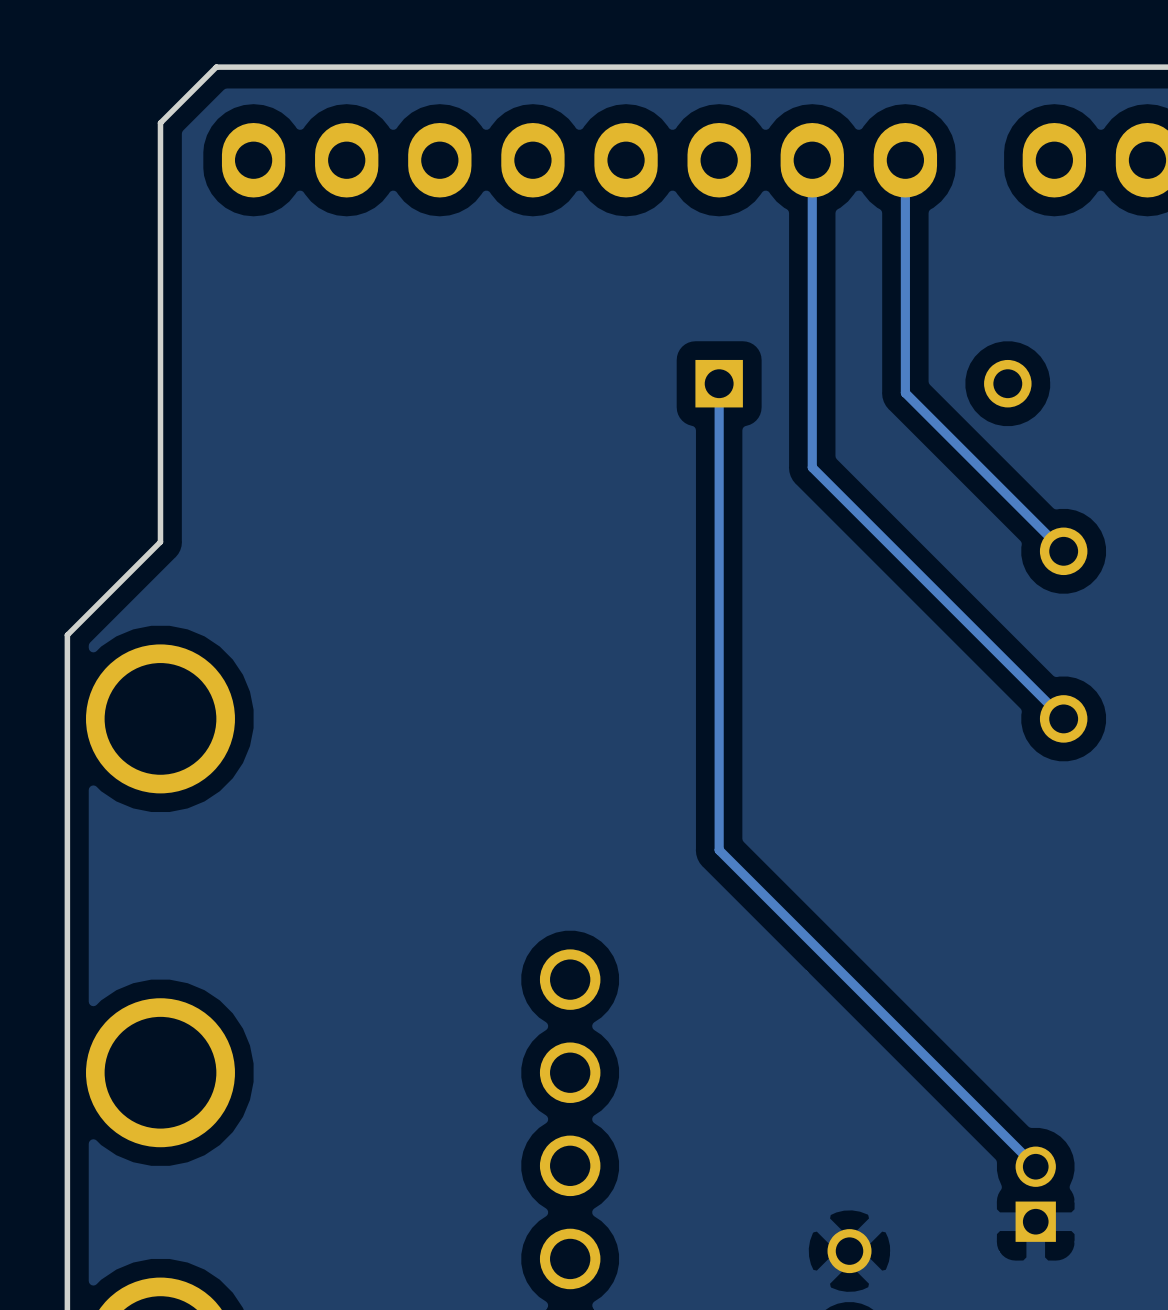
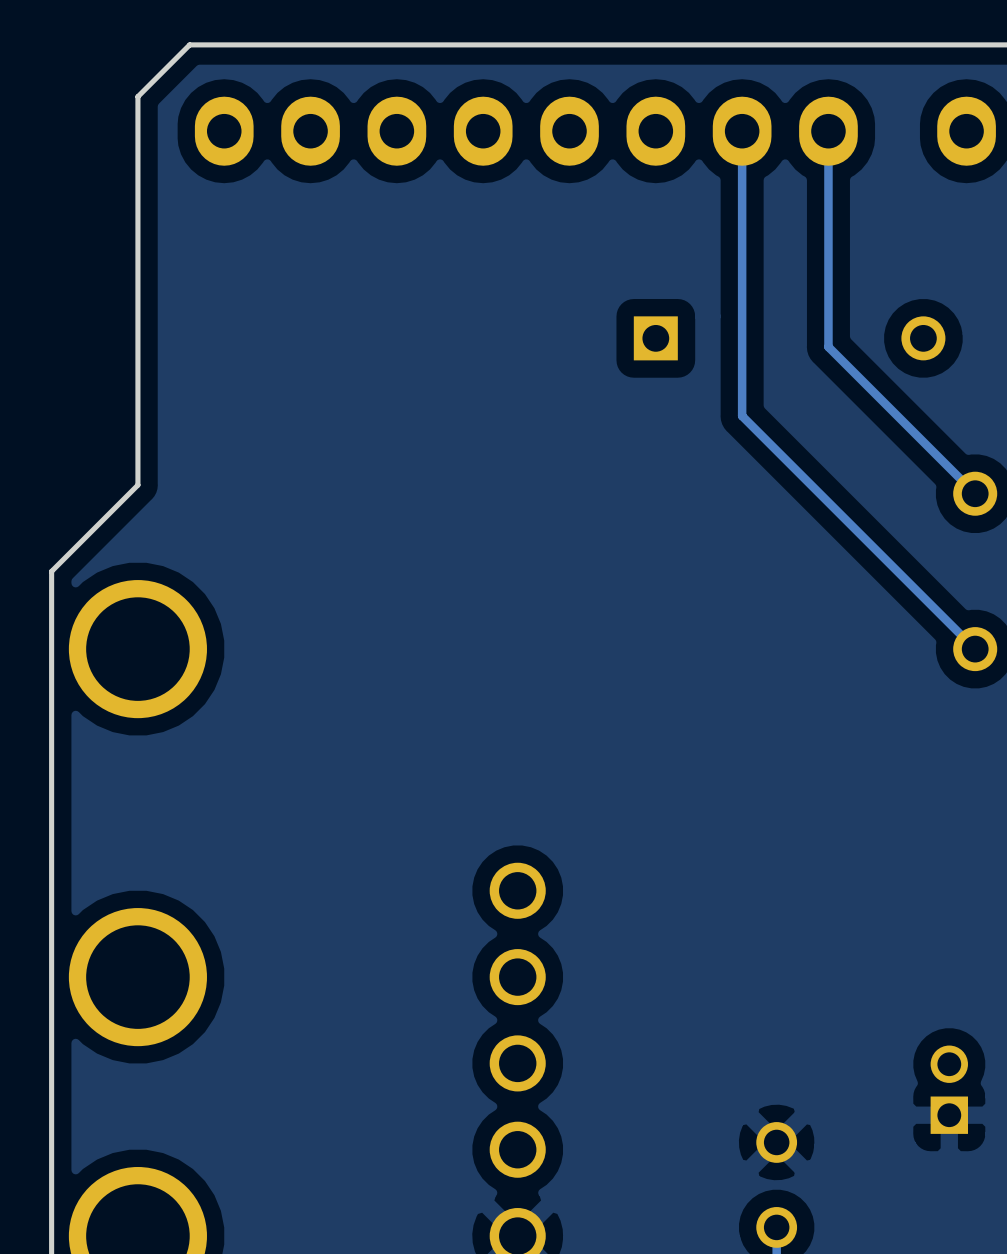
track: (719, 383) (719, 850) (1035, 1166) -> none

